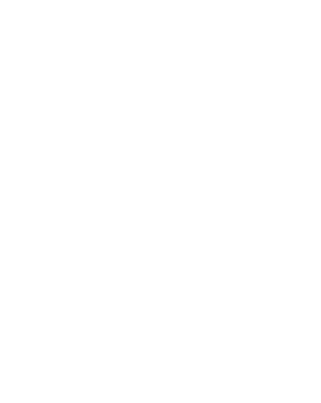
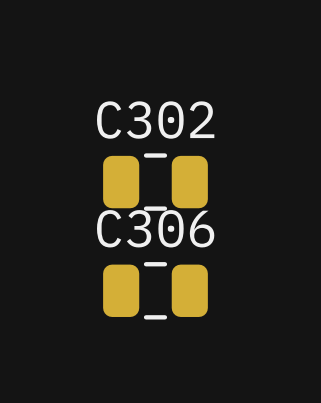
C302: none -> (155, 182)
C306: none -> (155, 290)

